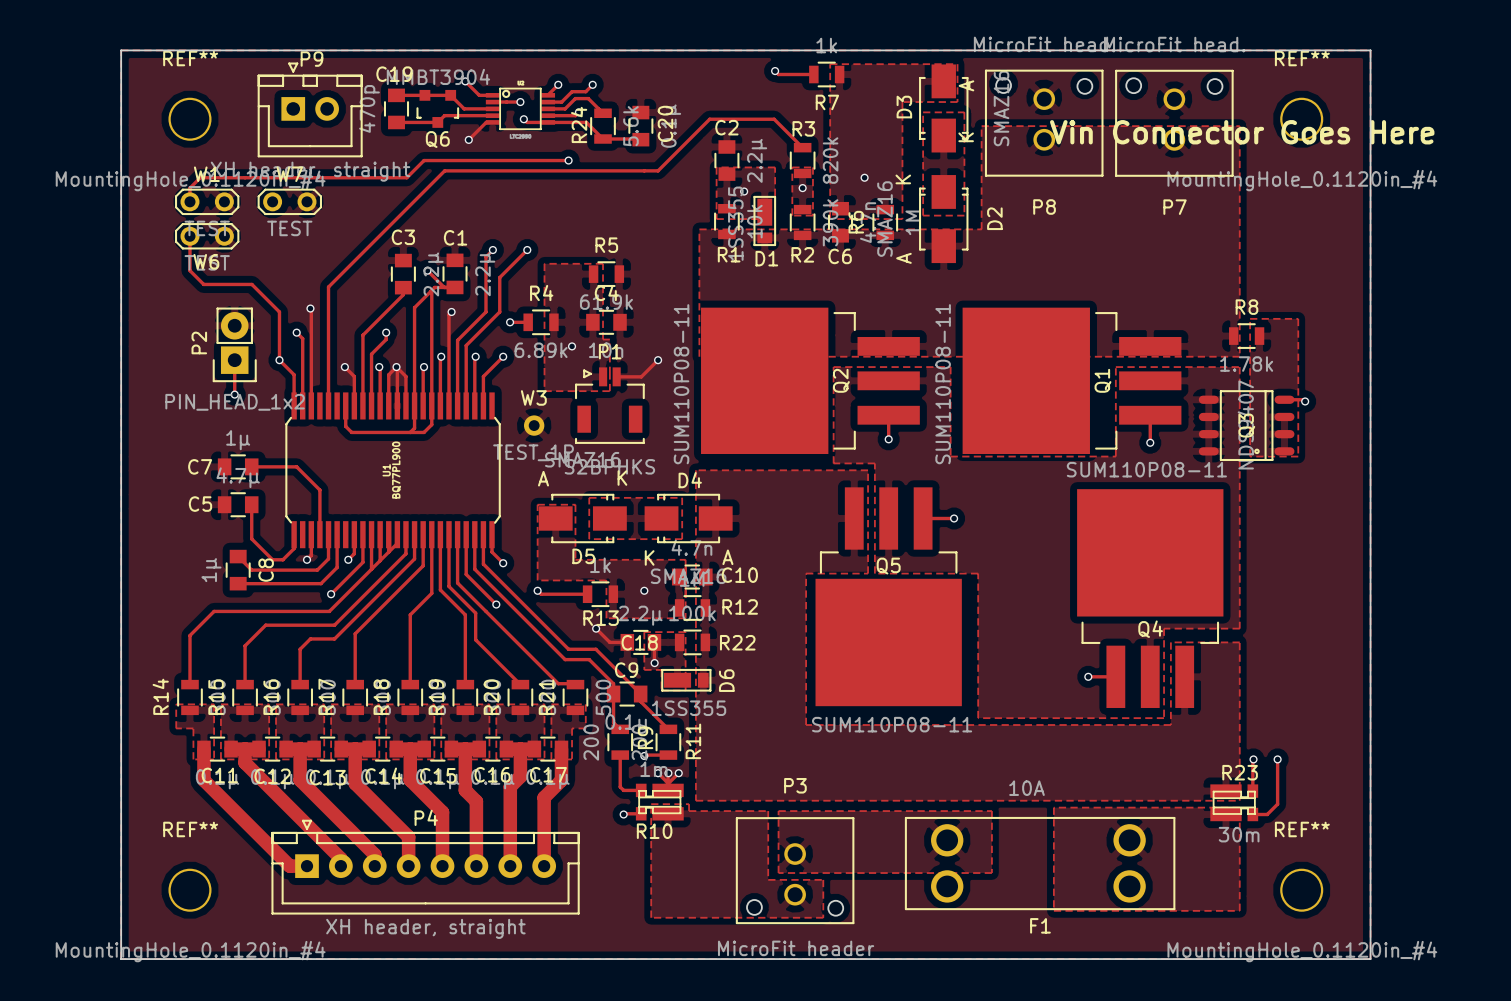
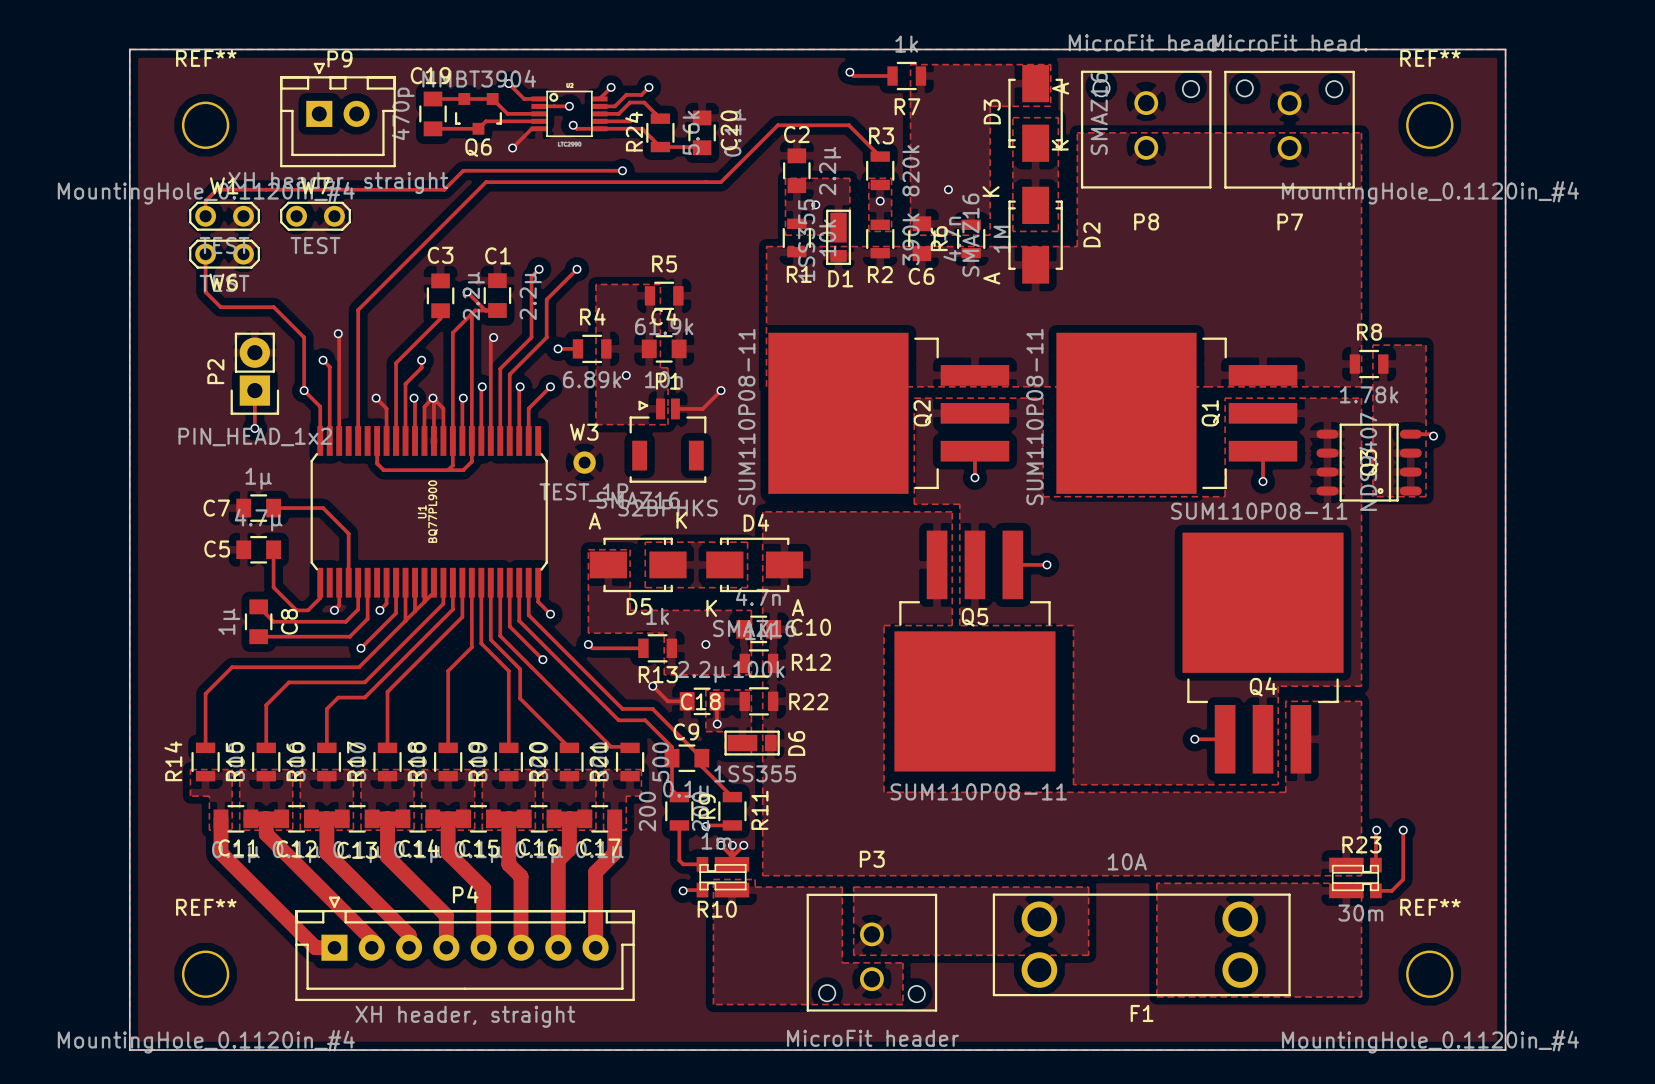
text: Vin Connector Goes Here (1242, 132) -> none

